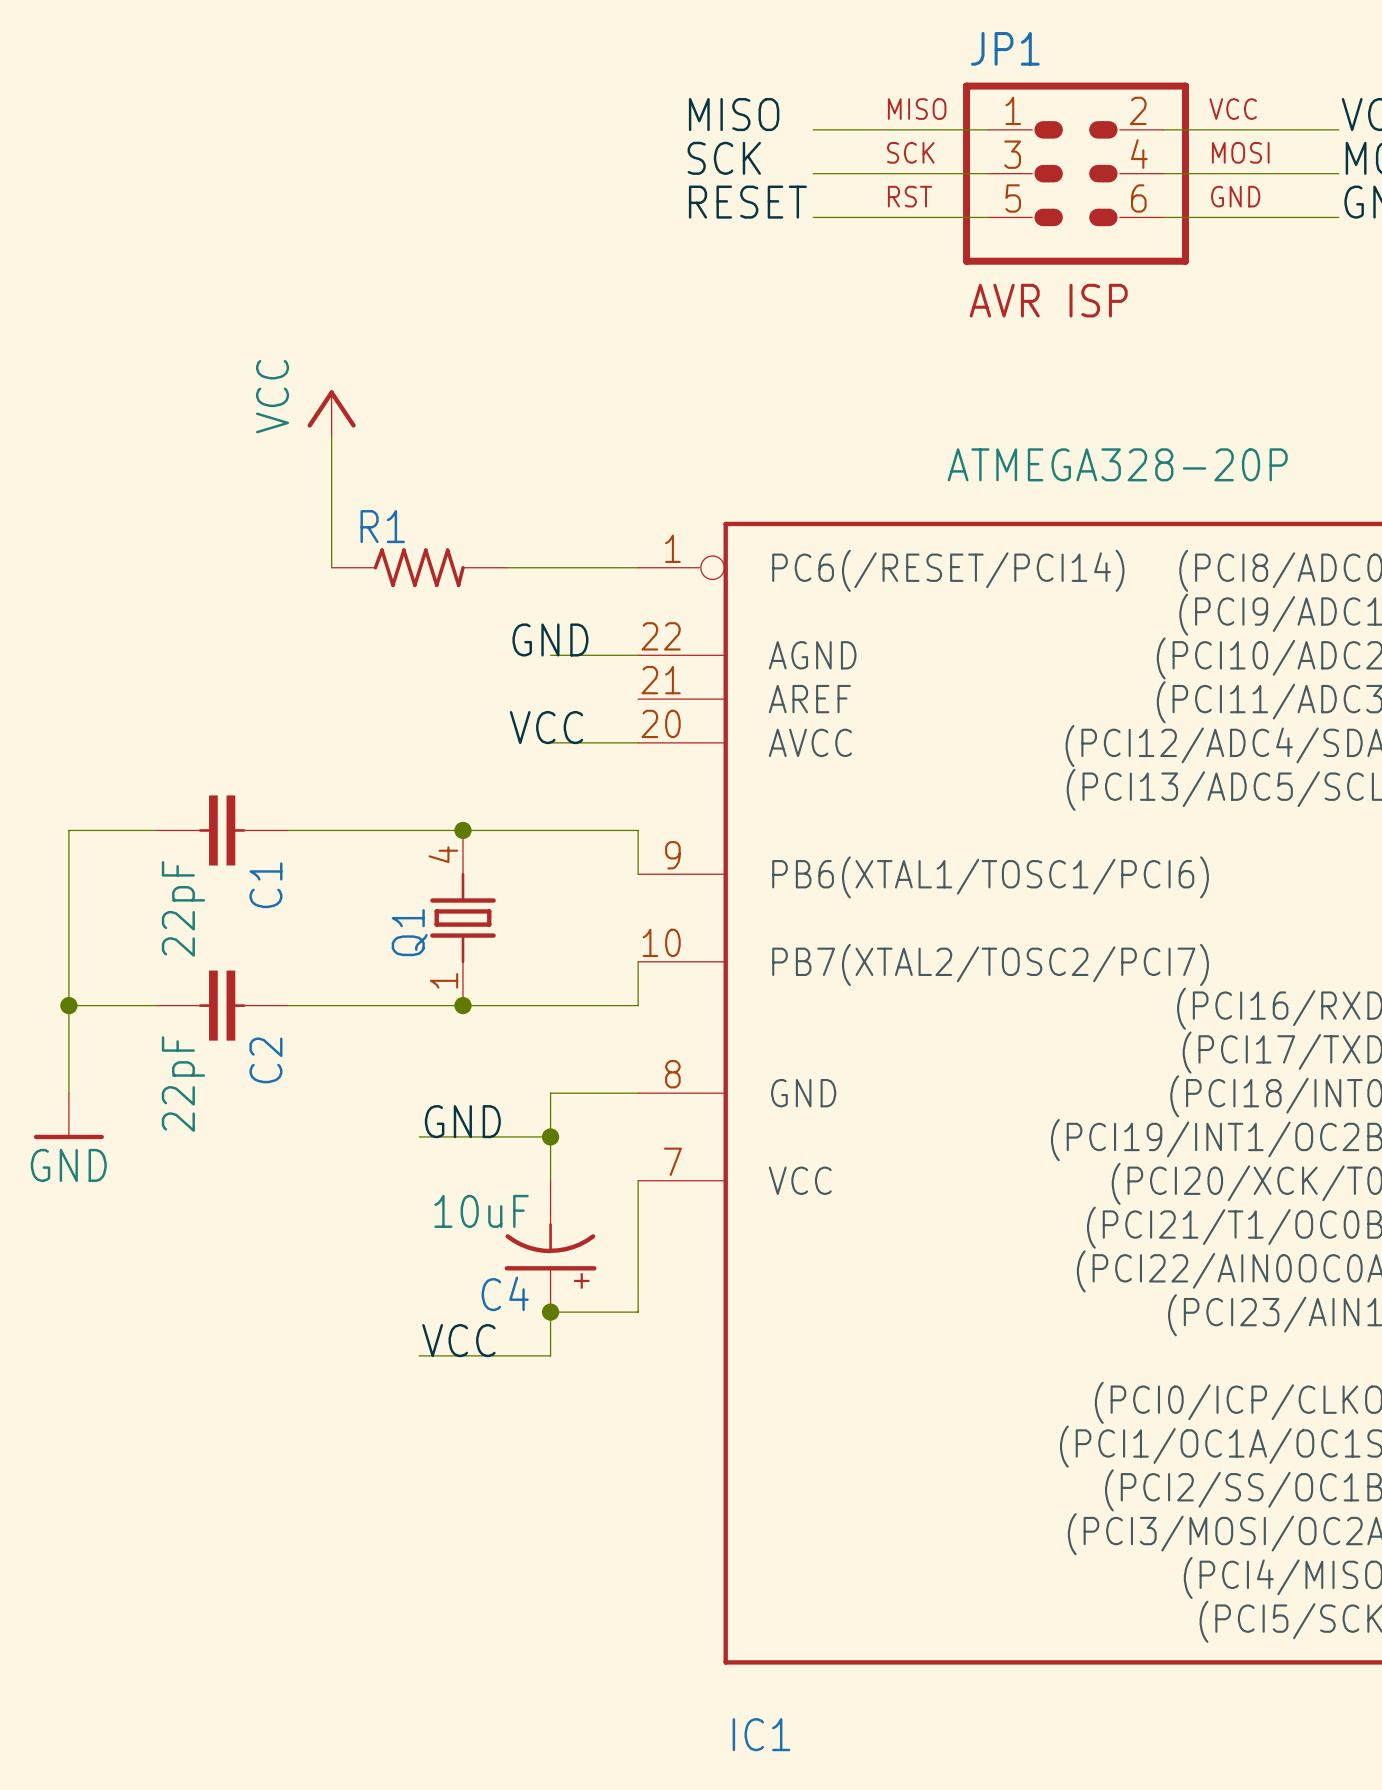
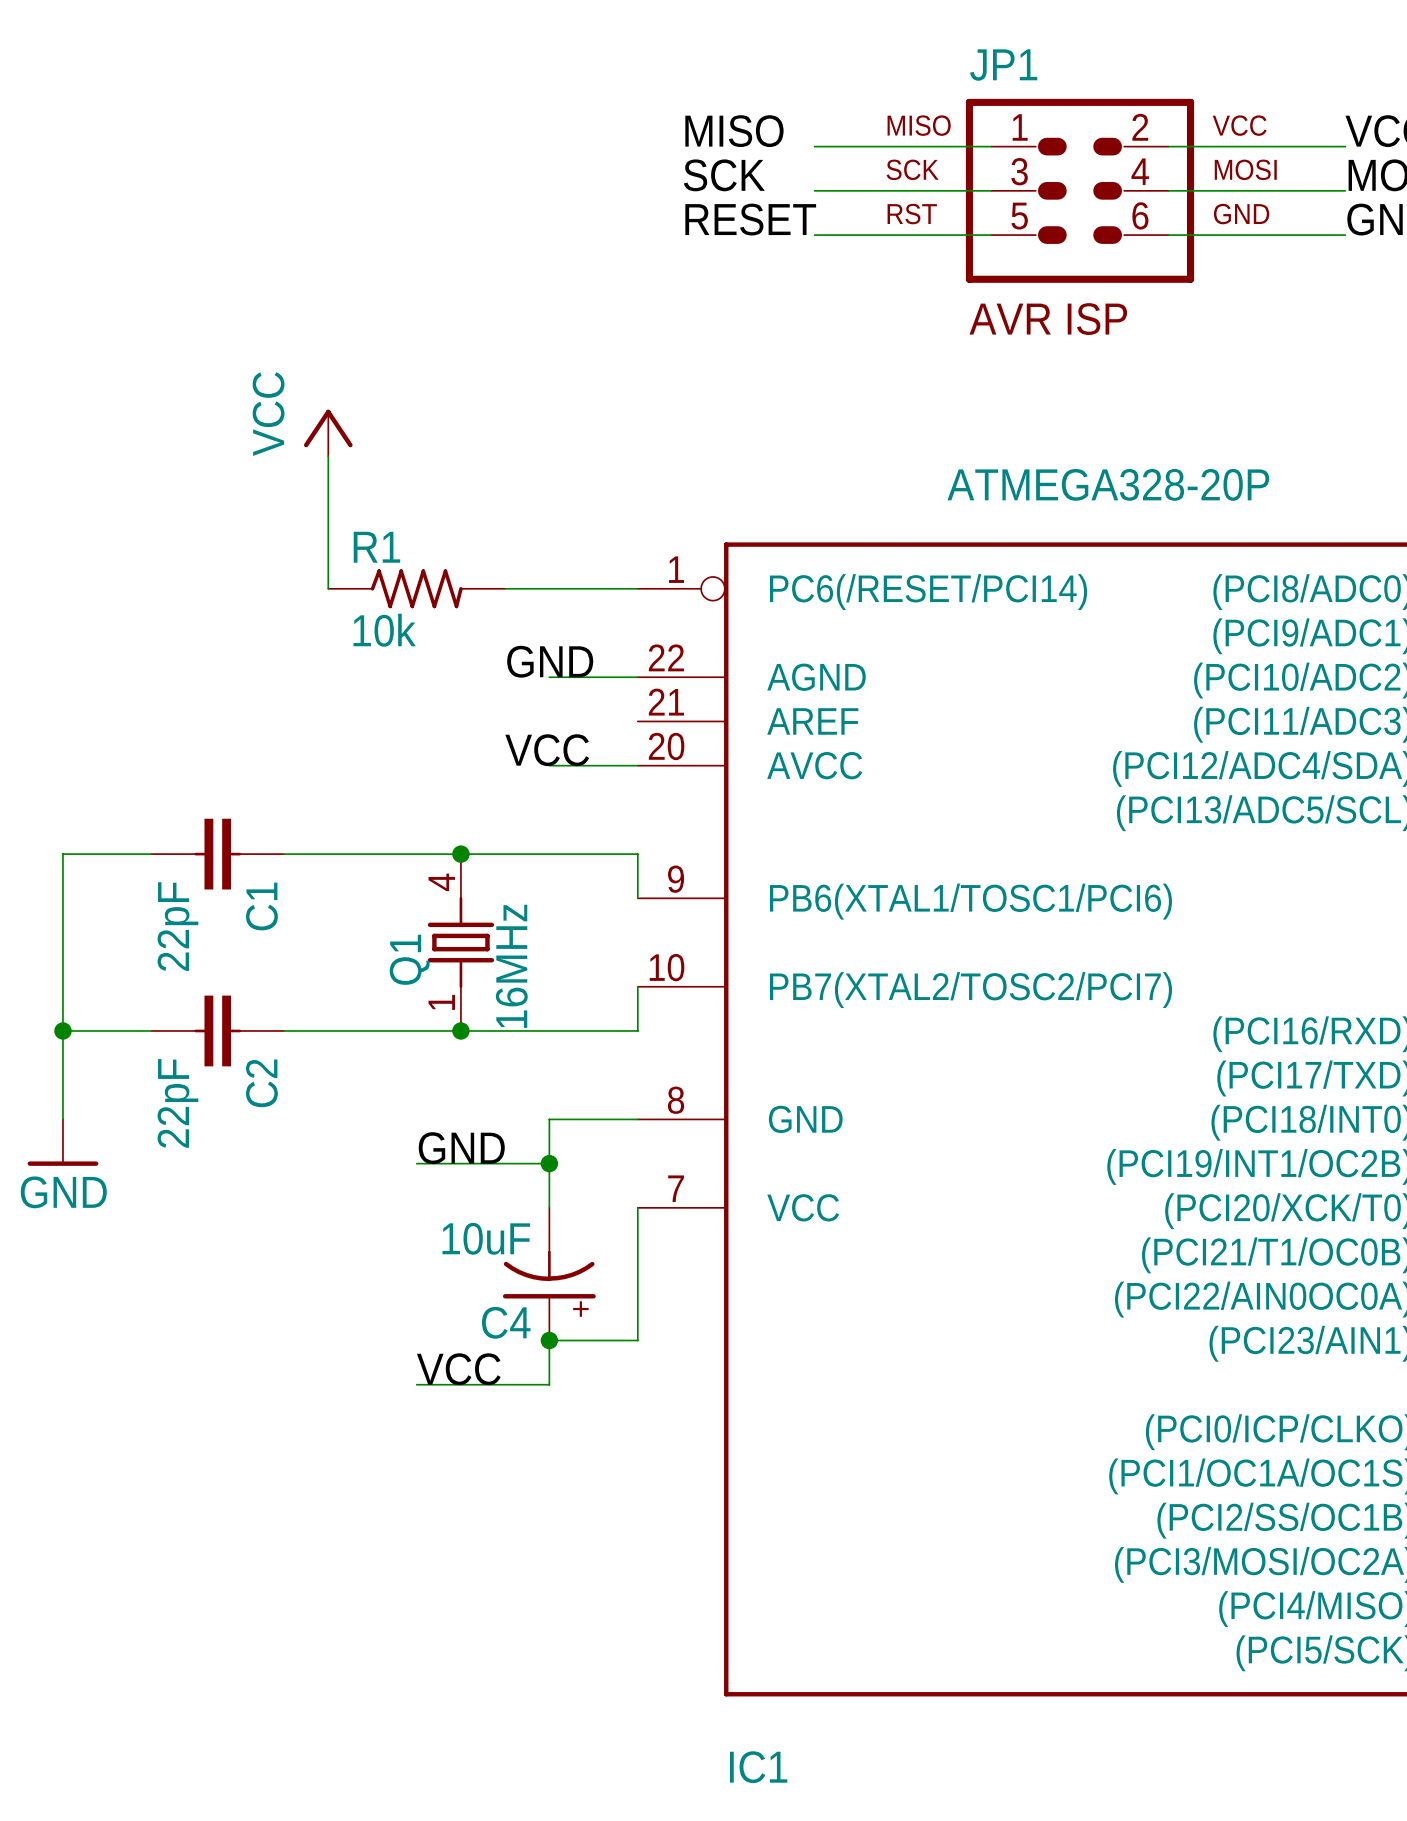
R1 value: none -> 10k (384, 630)
Q1 value: none -> 16MHz (511, 966)

